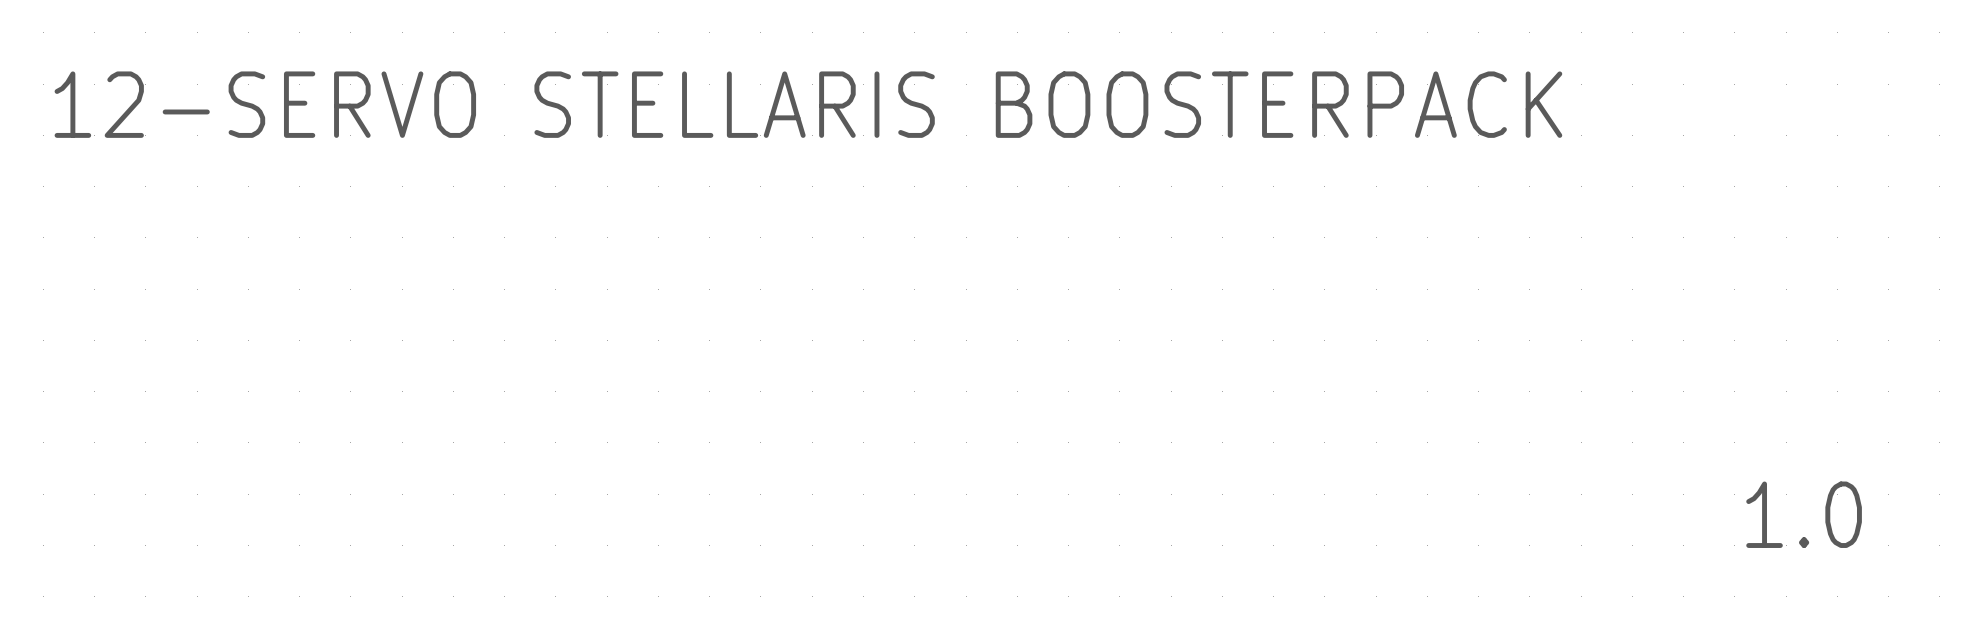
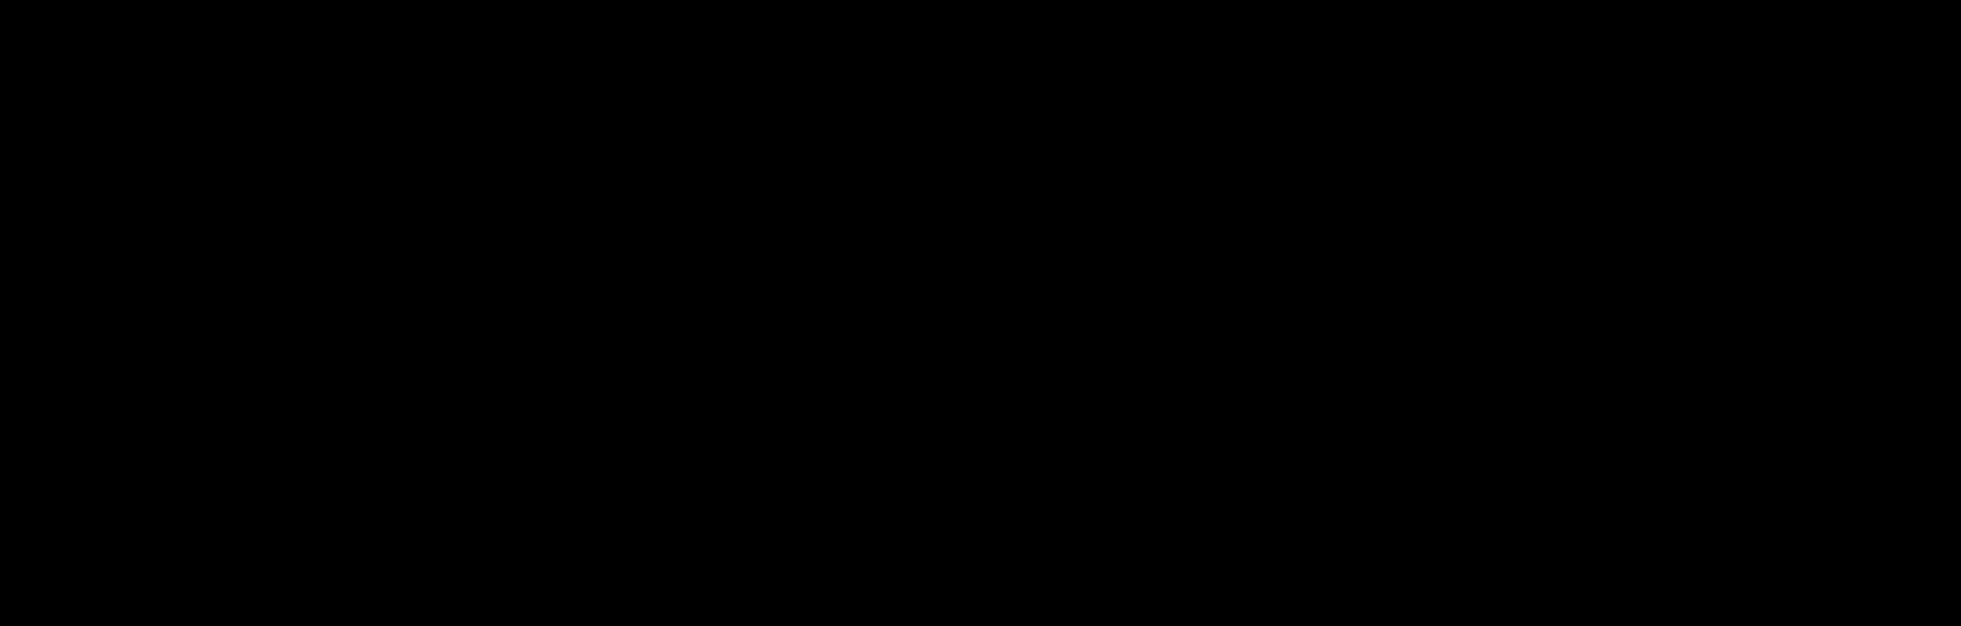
text: 12-SERVO STELLARIS BOOSTERPACK (808, 104) -> none
text: 1.0 (1804, 514) -> none

